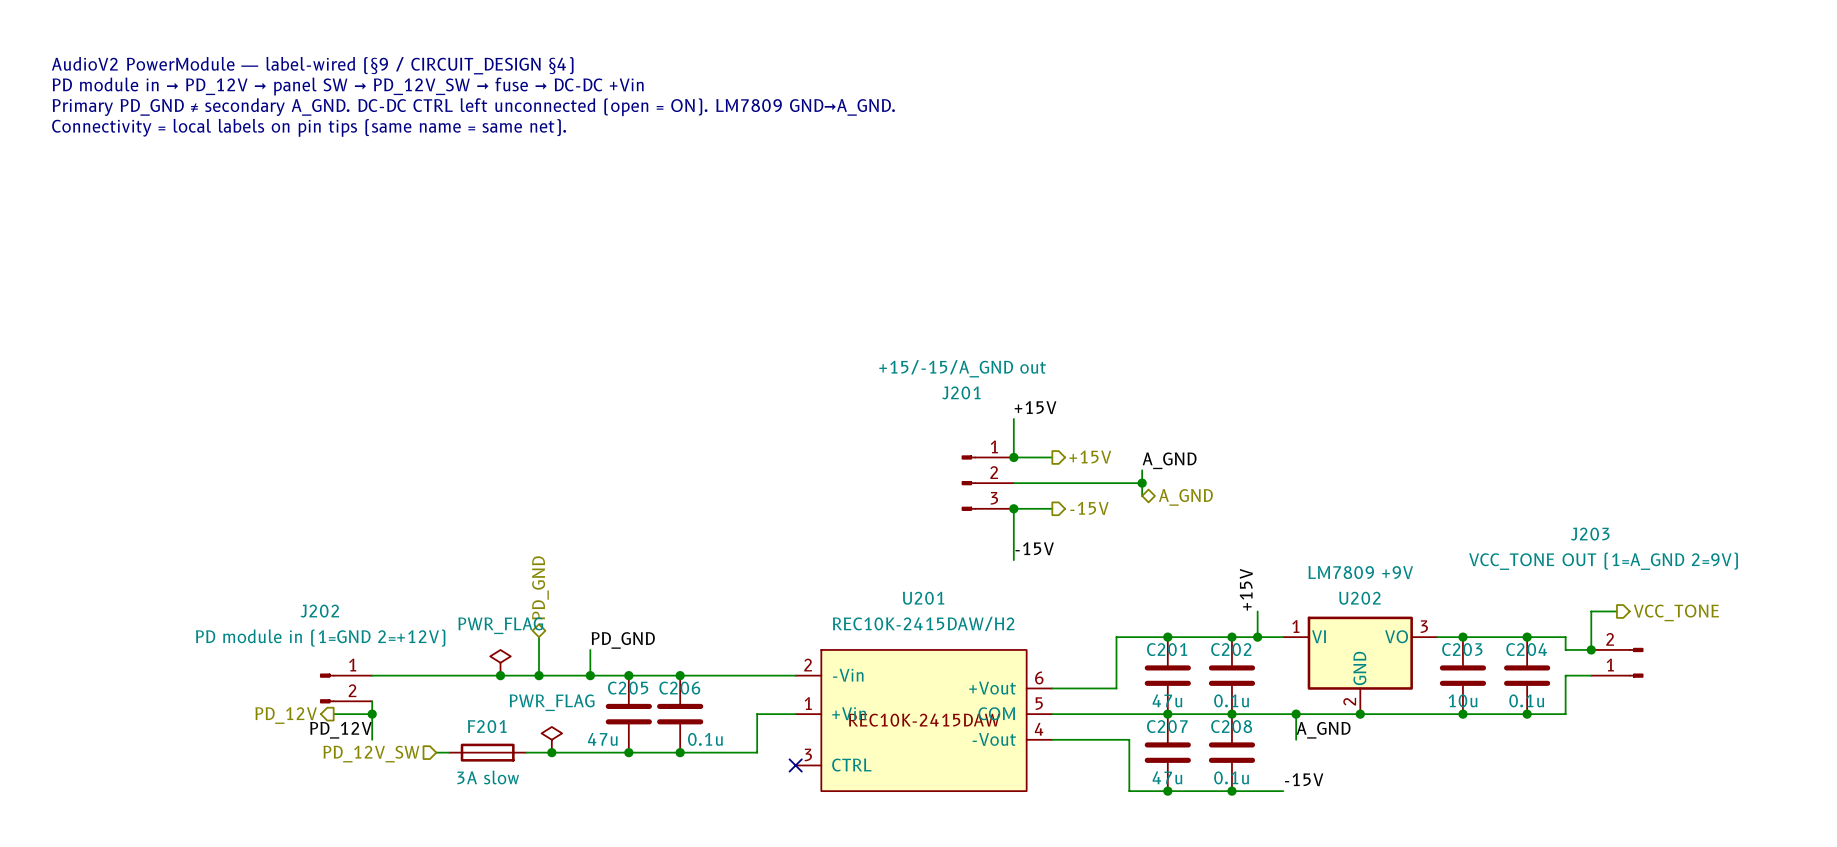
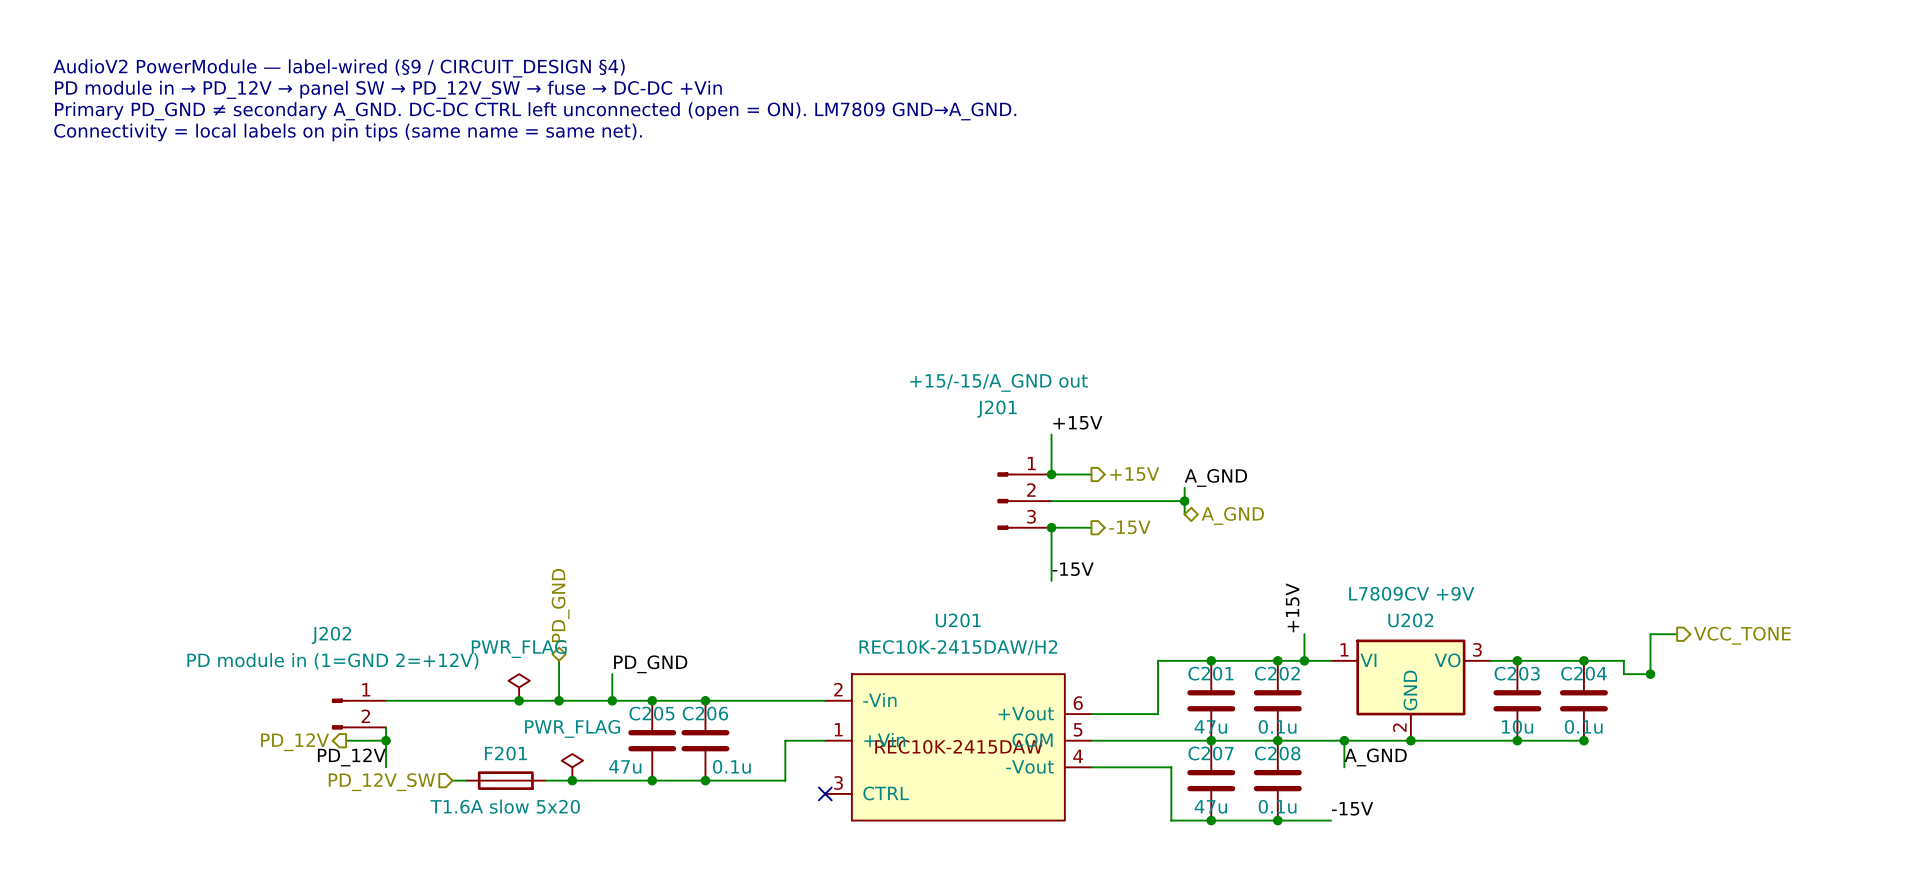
U202 value: LM7809 +9V (1360, 572) -> L7809CV +9V (1411, 593)
J203: VCC_TONE OUT (1=A_GND 2=9V) (1617, 662) -> none
wire: (1591, 675) (1565, 675) (1565, 714) (1527, 714) -> none
F201 value: 3A slow (488, 777) -> T1.6A slow 5x20 (505, 806)

